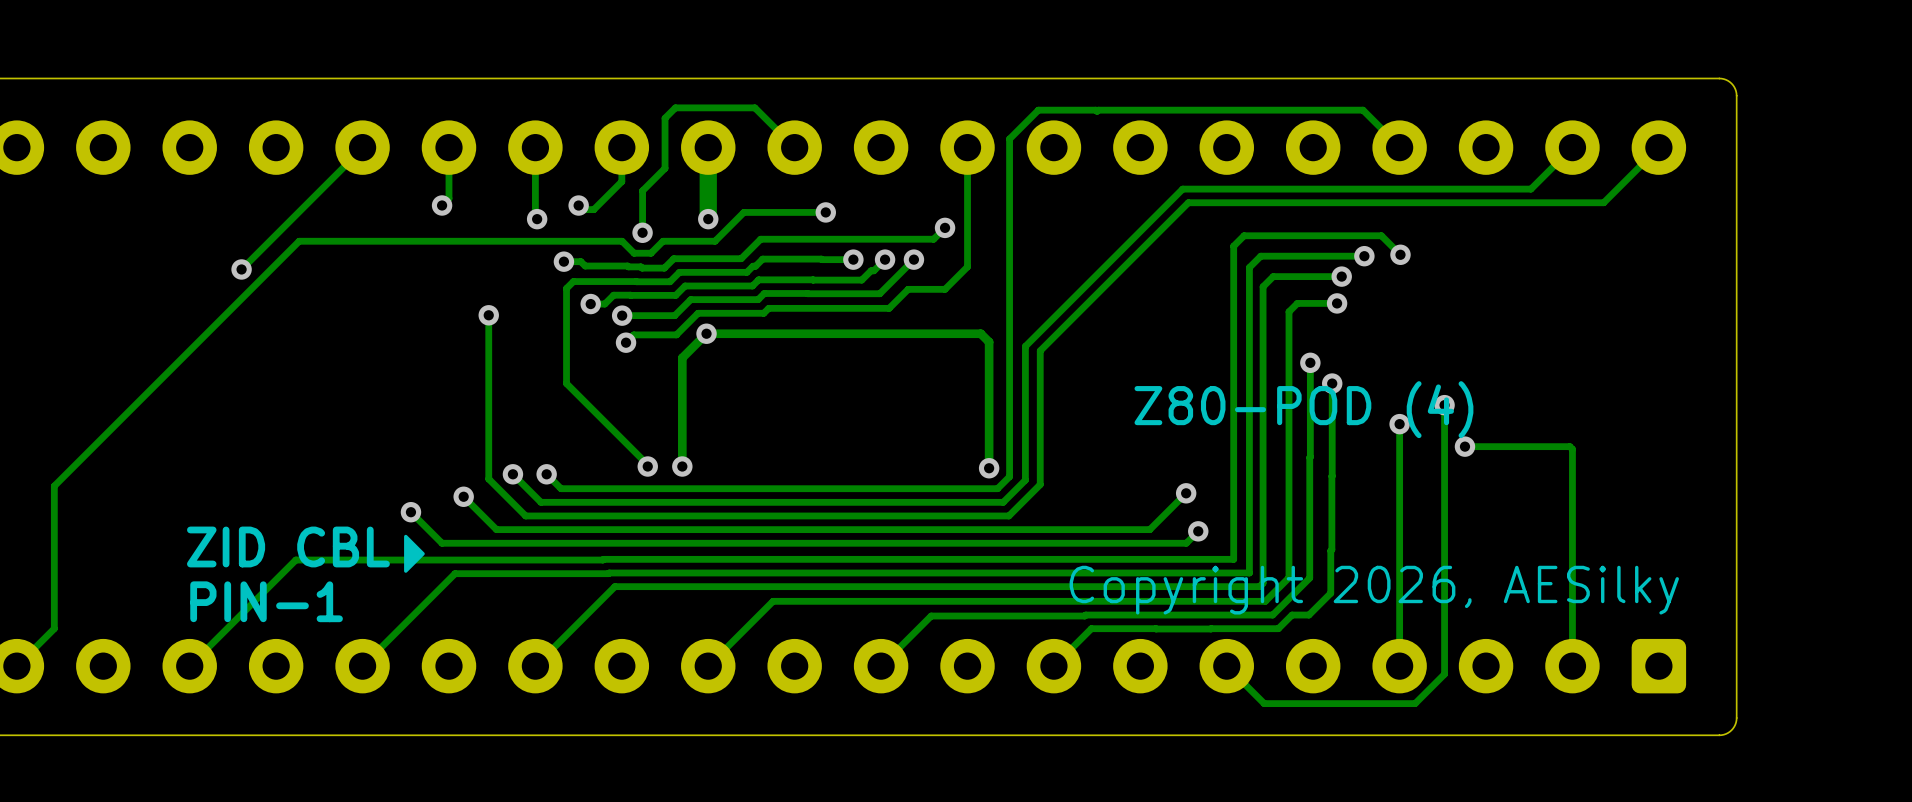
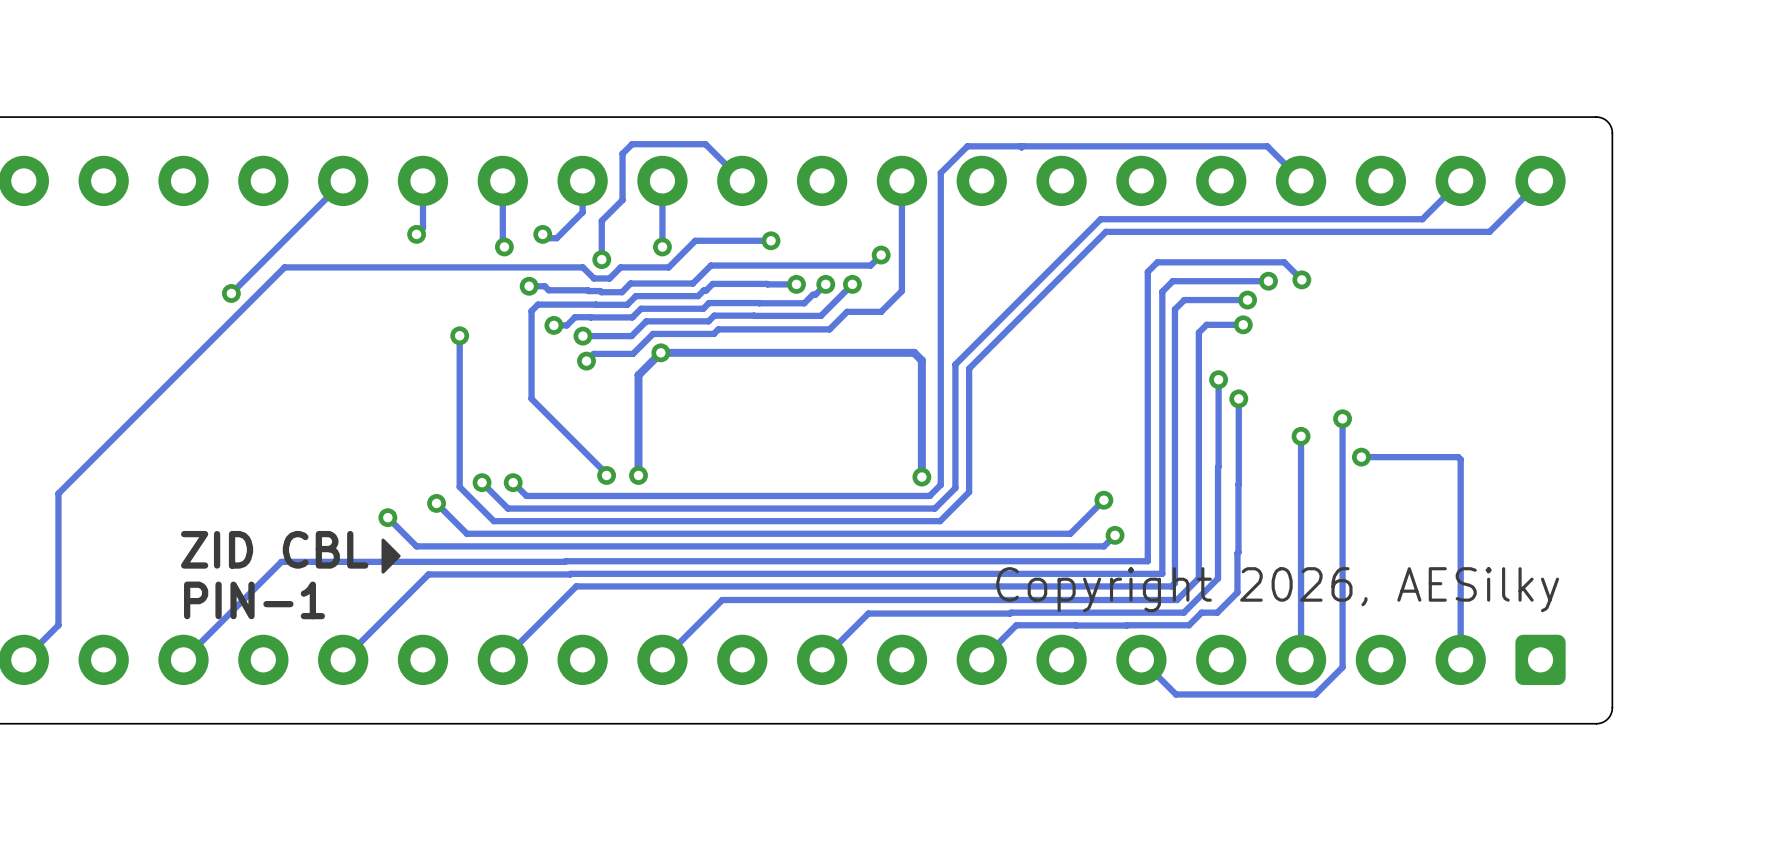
track width: thick (708, 147) (708, 219) -> thin (662, 180) (662, 246)
part: Z80-POD (4) (1303, 409) -> none

